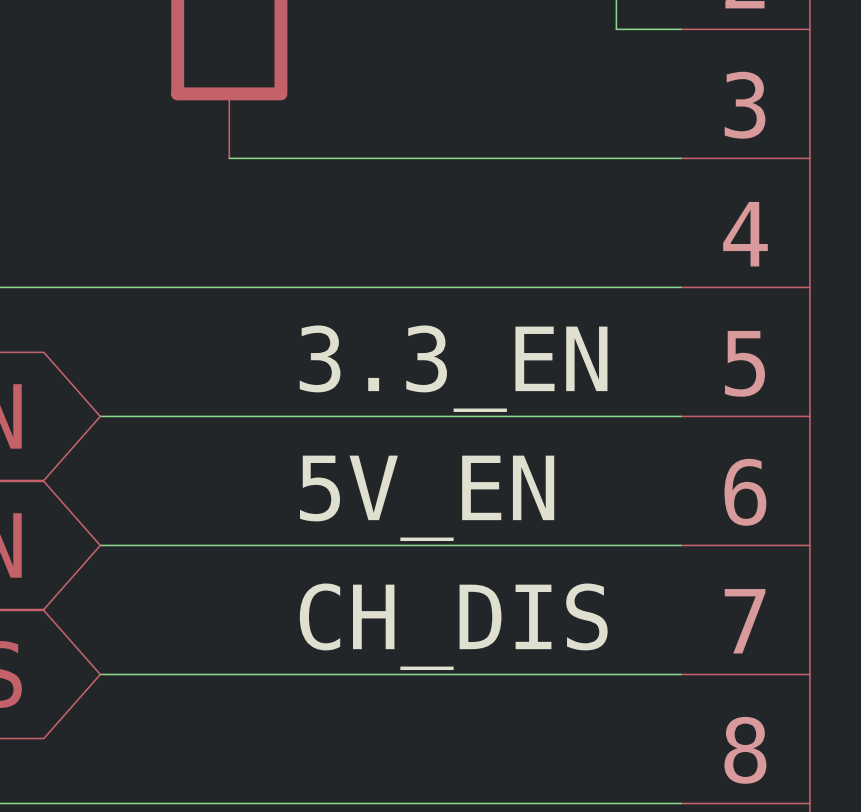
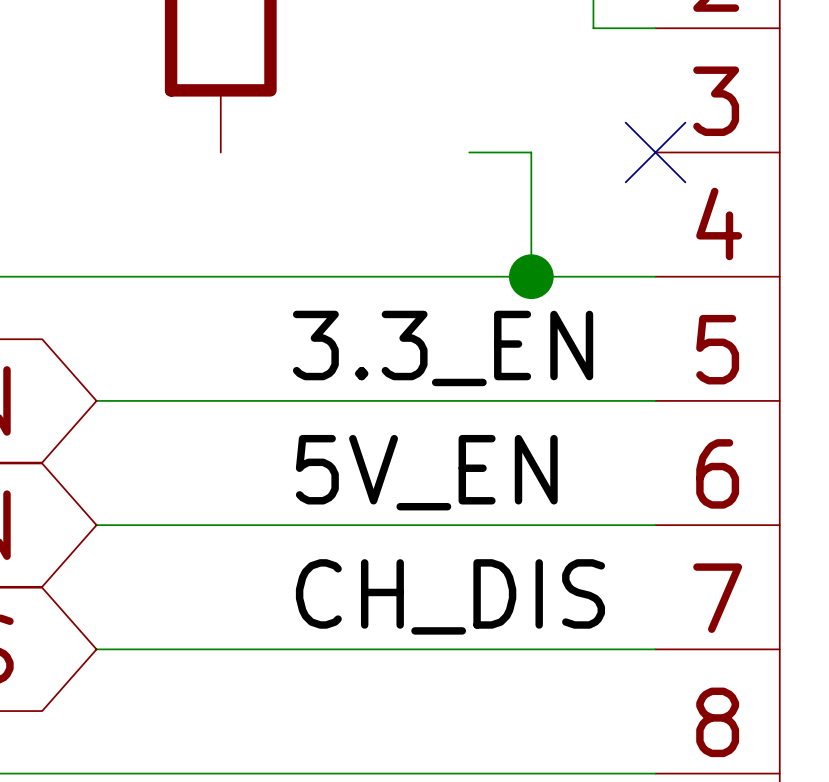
wire: (229, 158) (487, 158) -> none
wire: (551, 158) (680, 158) -> (531, 152) (531, 276)
no-connect mark: none -> (655, 152)
junction: none -> (531, 276)

